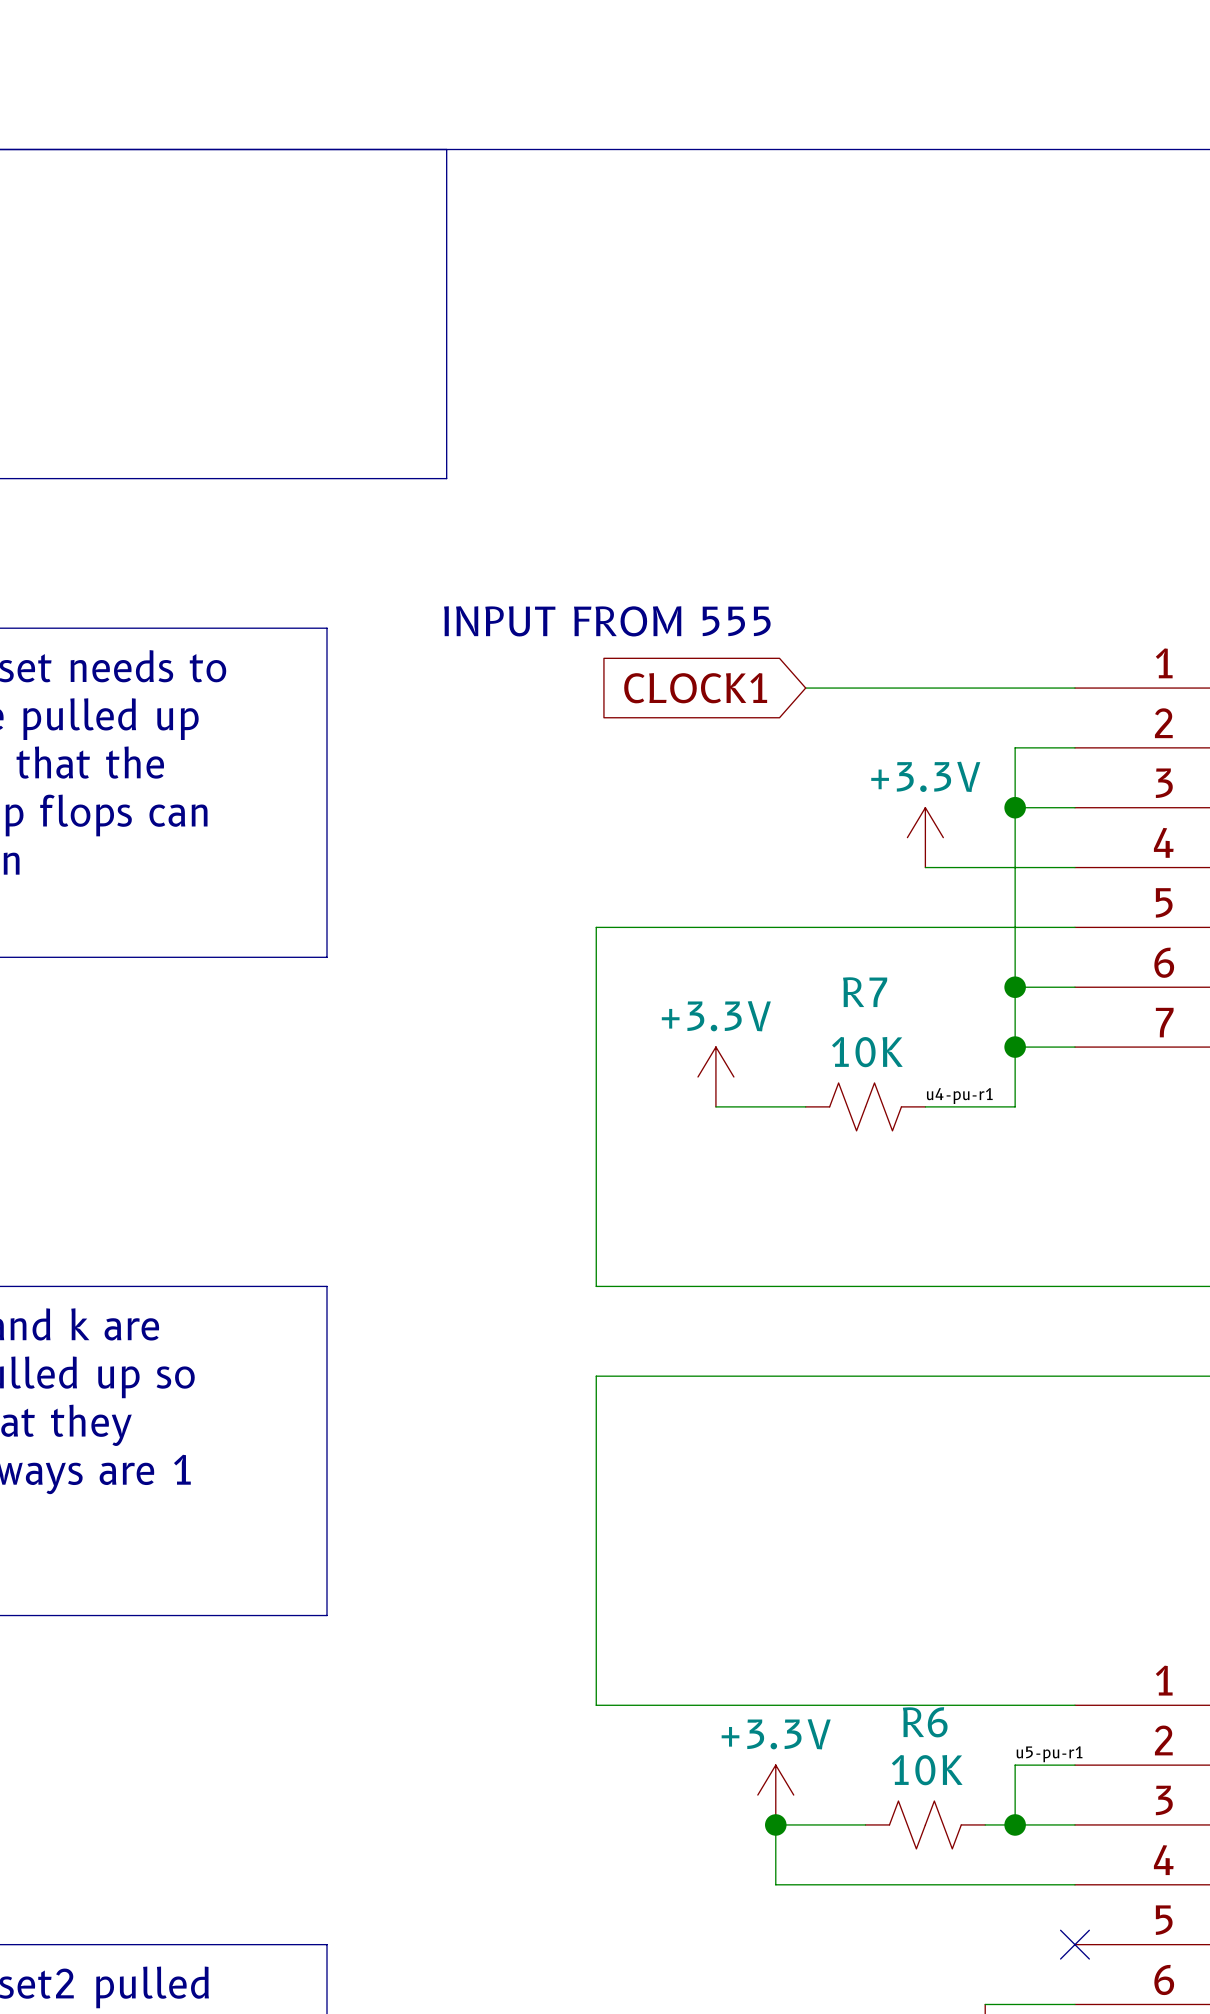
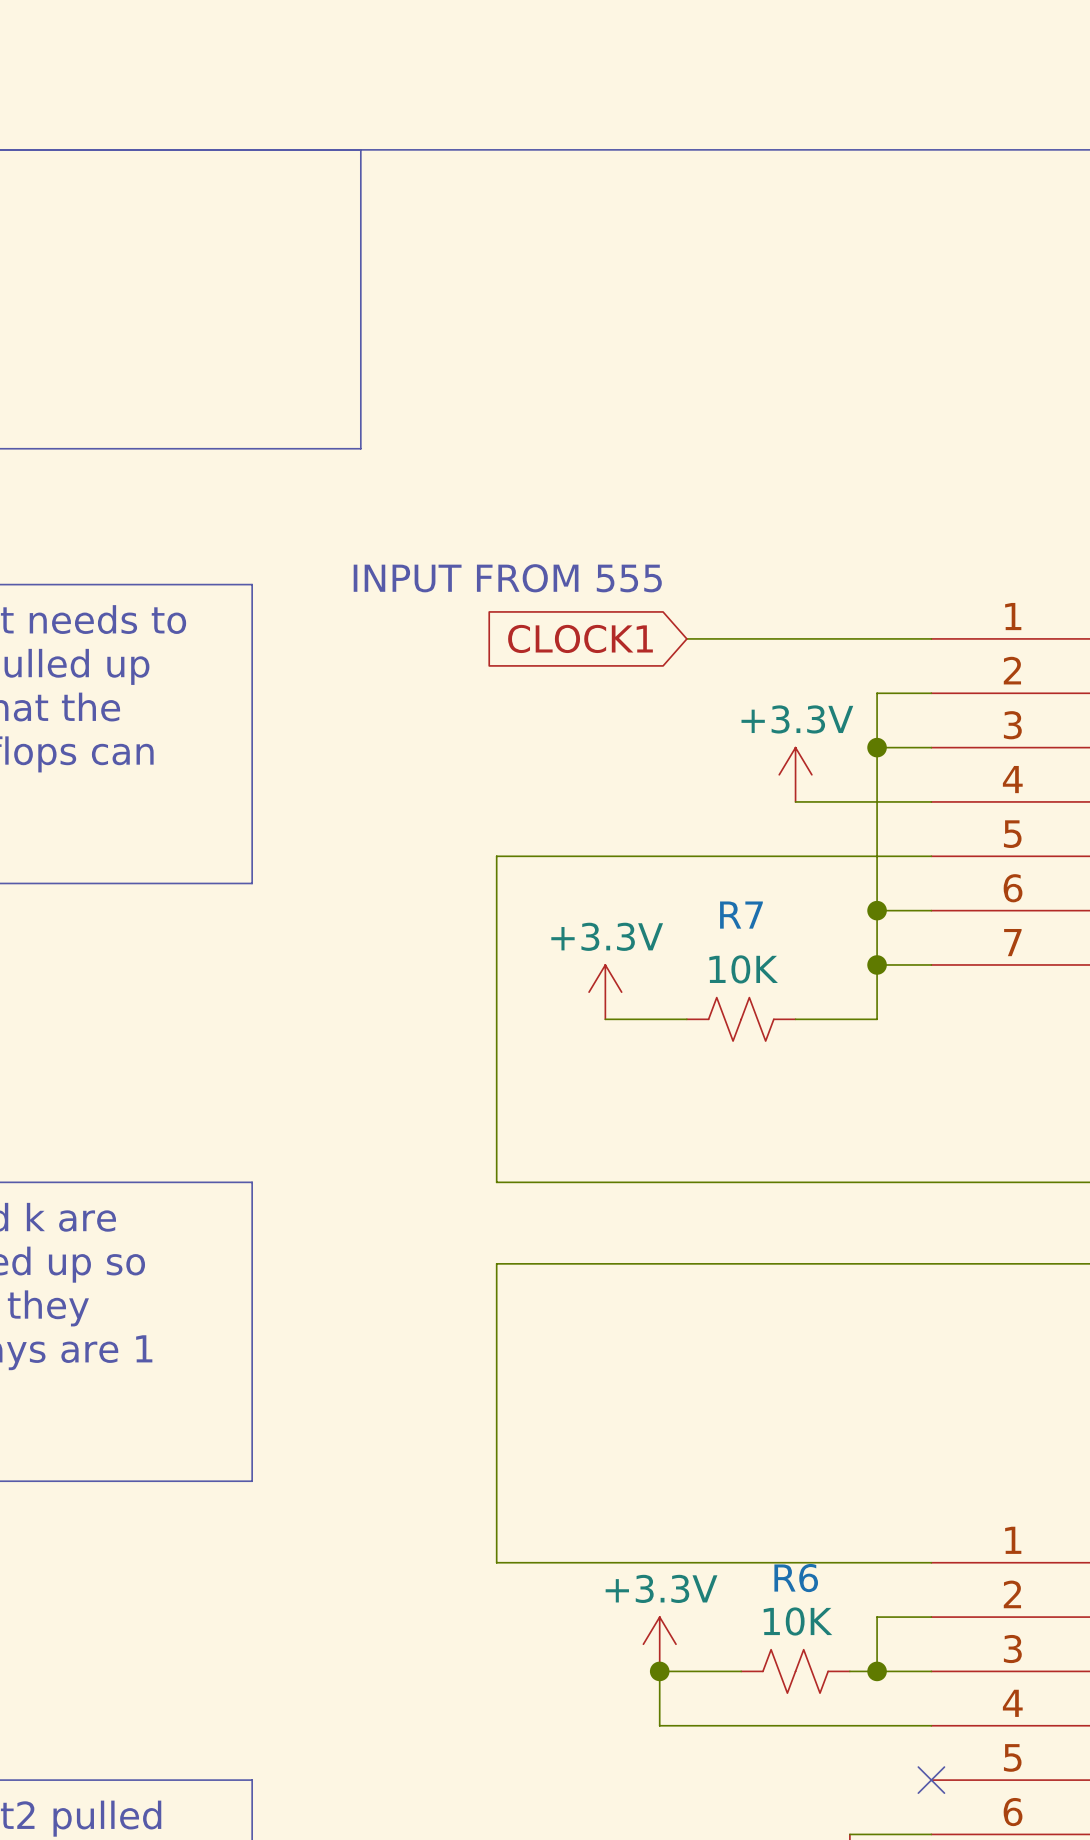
label: u4-pu-r1 (959, 1096) -> none
label: u5-pu-r1 (1049, 1754) -> none

